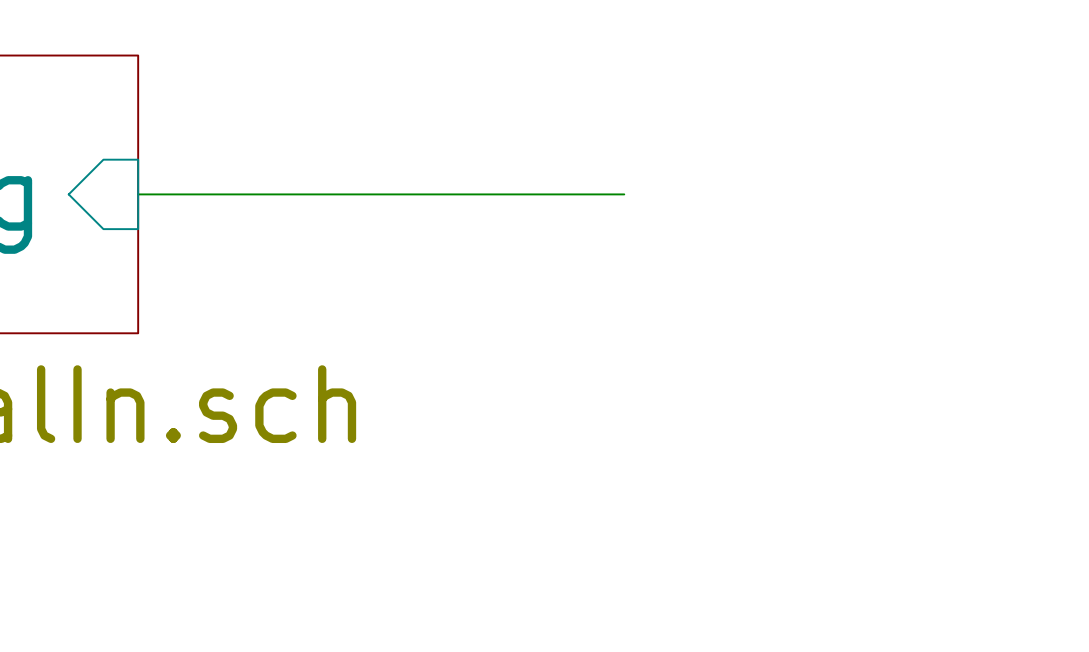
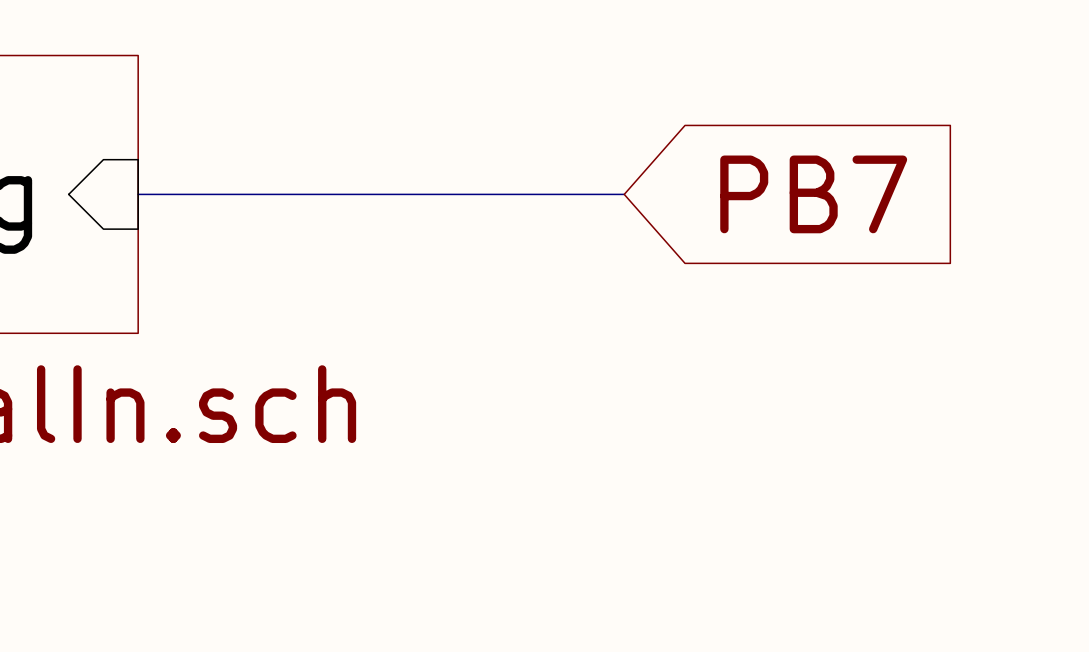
global label: none -> PB7 (813, 194)

